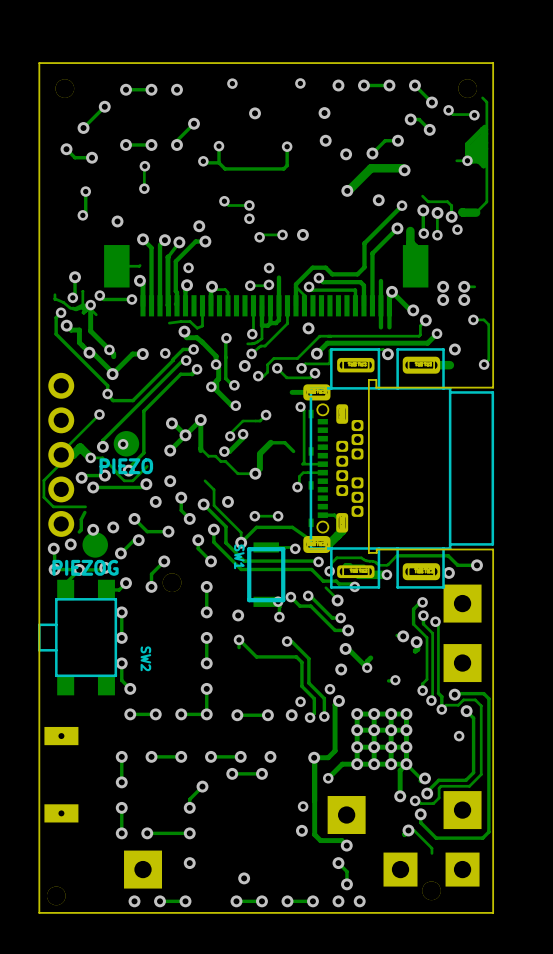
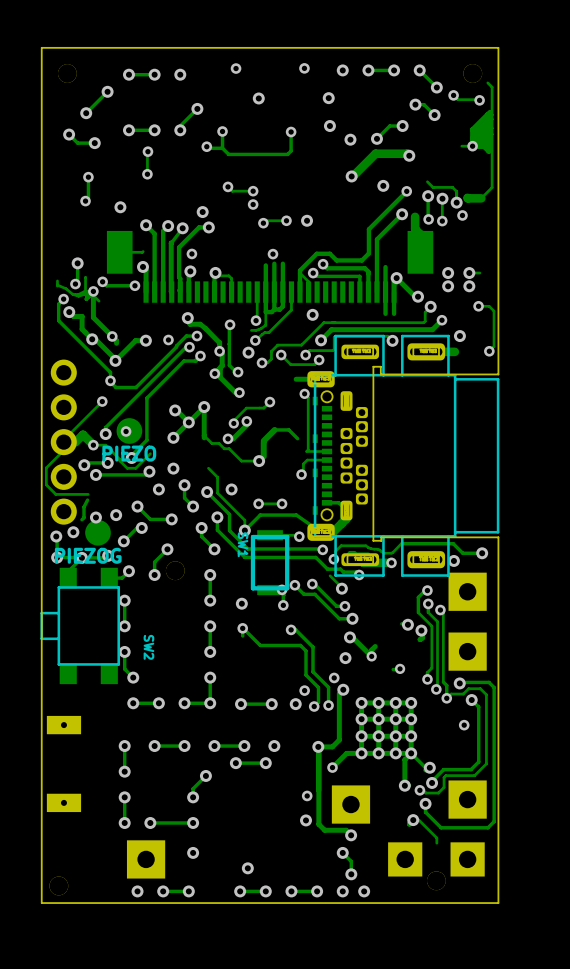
track: none -> (274, 263) (274, 292)
track: none -> (265, 265) (265, 292)
track: (268, 284) (250, 285) -> none
via: (268, 284) -> none
via: (250, 285) -> none
track: (202, 305) (202, 326) (197, 328) (190, 321) (169, 323) -> none

